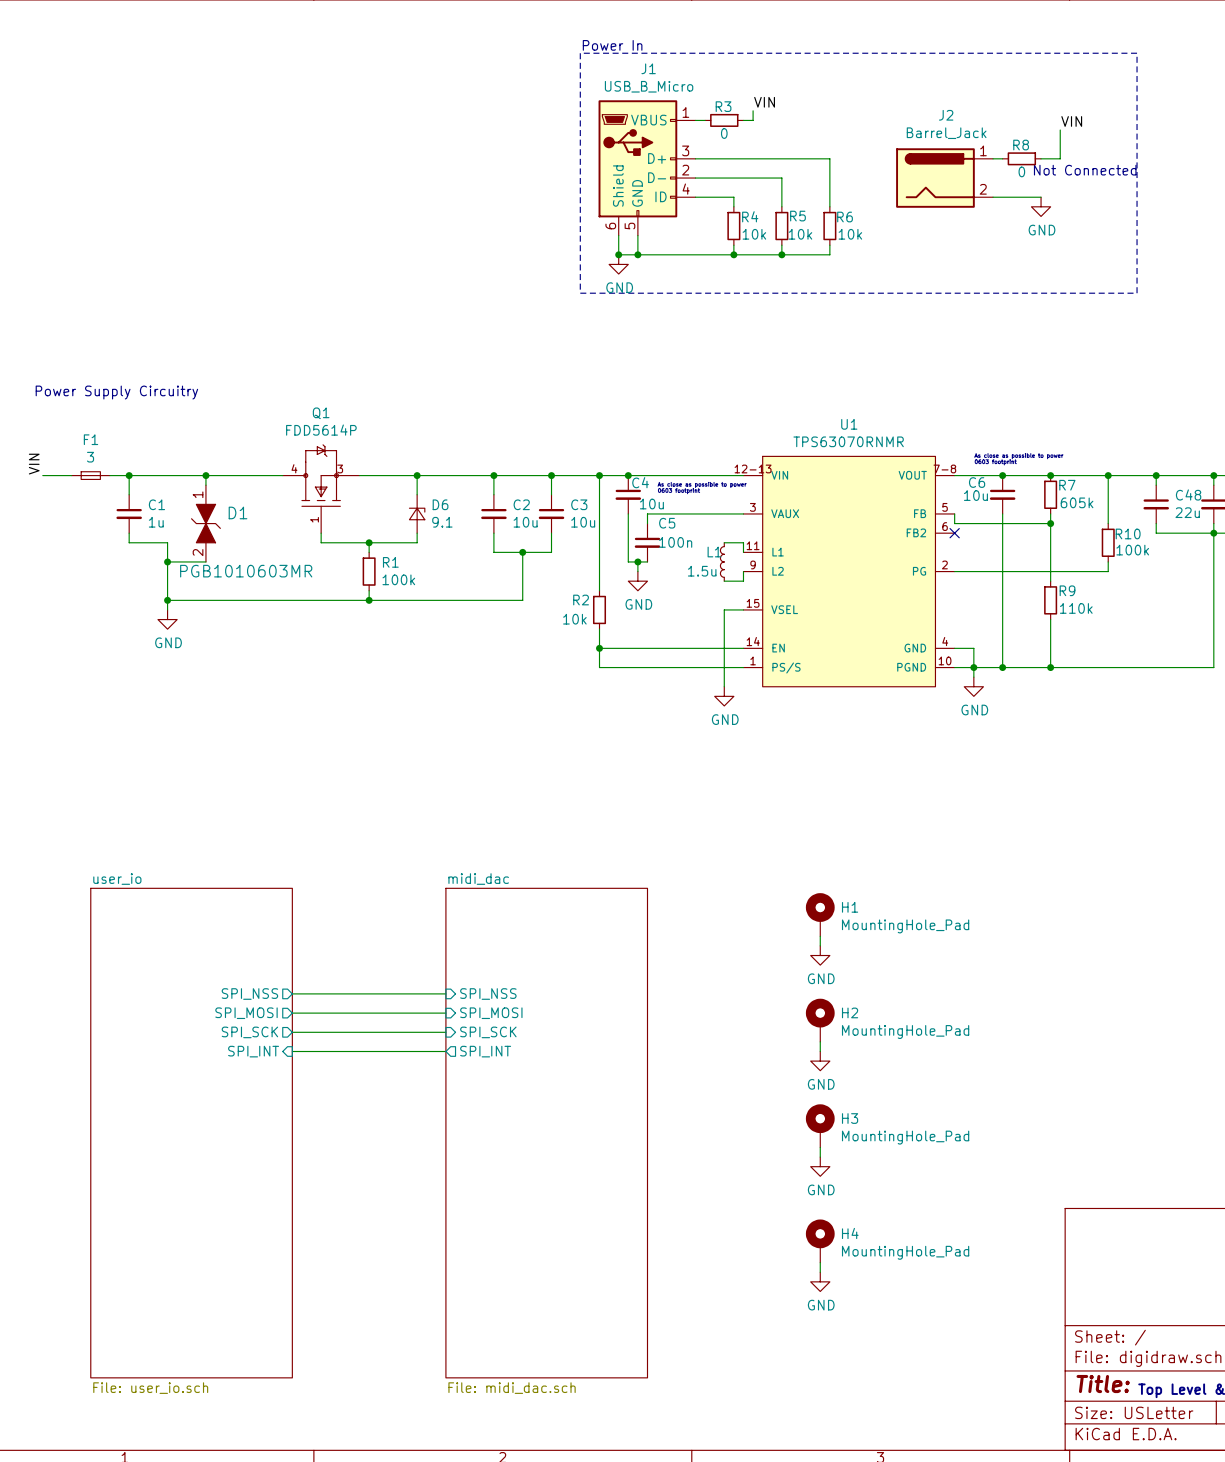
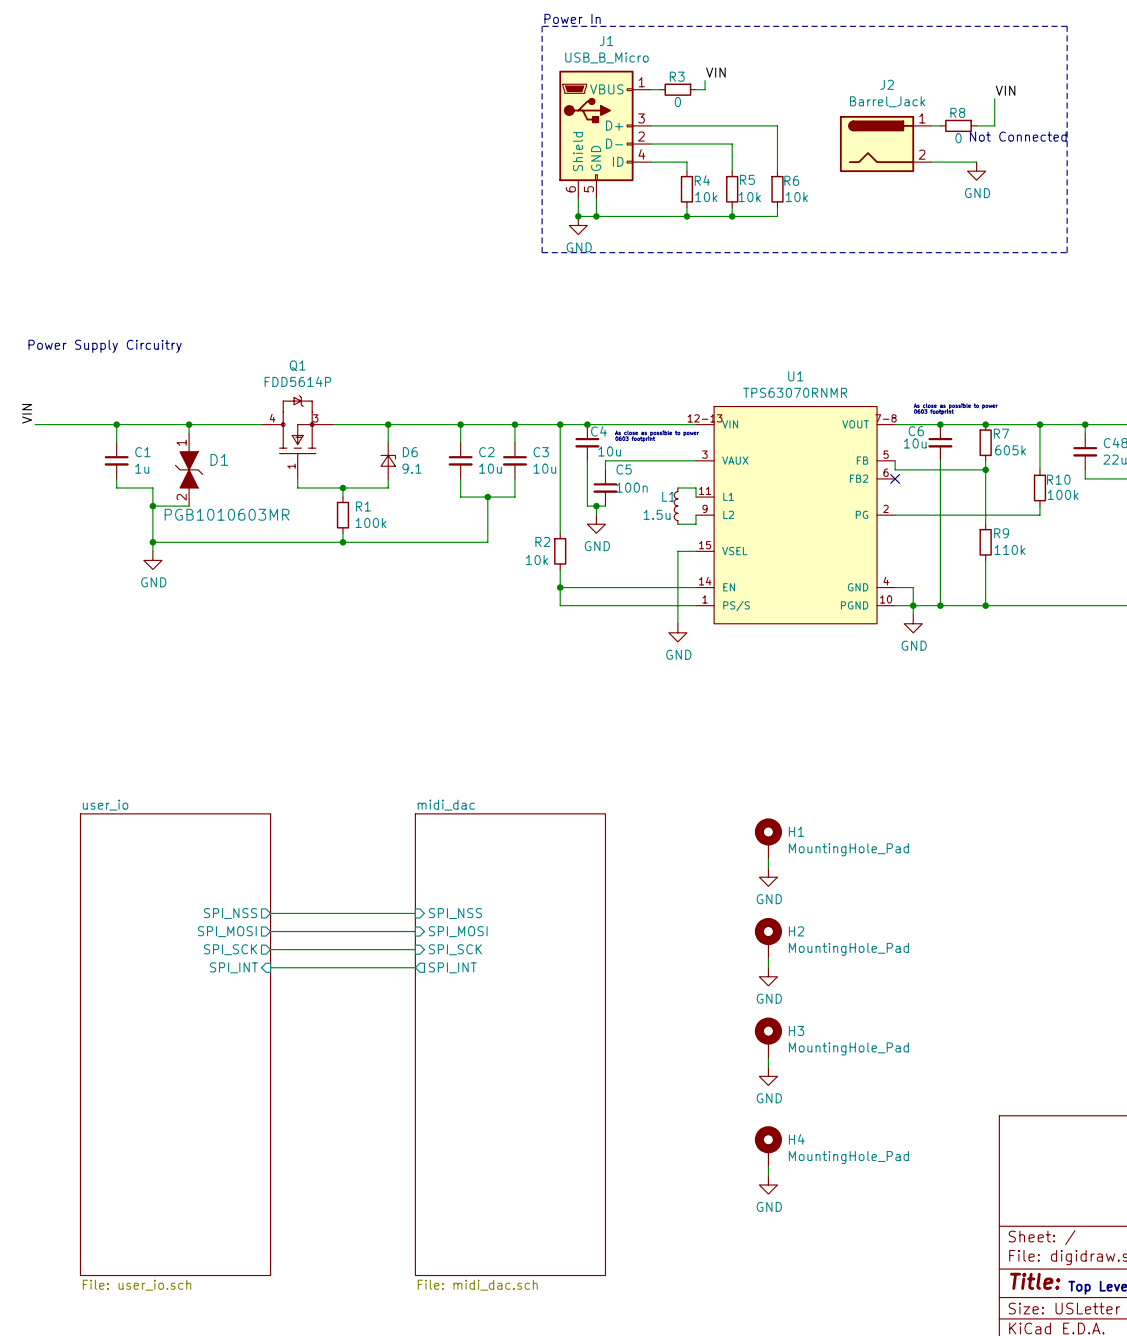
F1: 3 (90, 475) -> none

